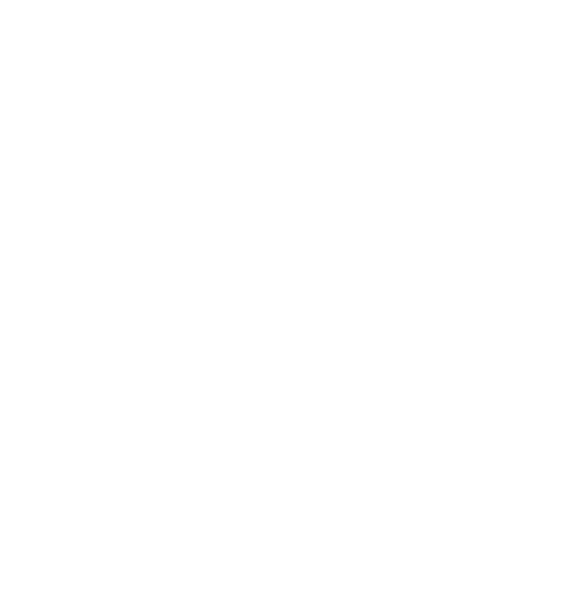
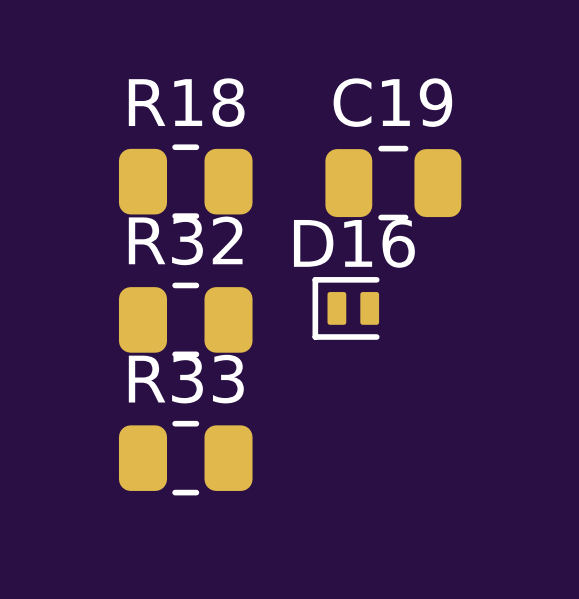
R18: none -> (185, 181)
C19: none -> (393, 183)
D16: none -> (346, 308)
R32: none -> (185, 319)
R33: none -> (185, 458)

